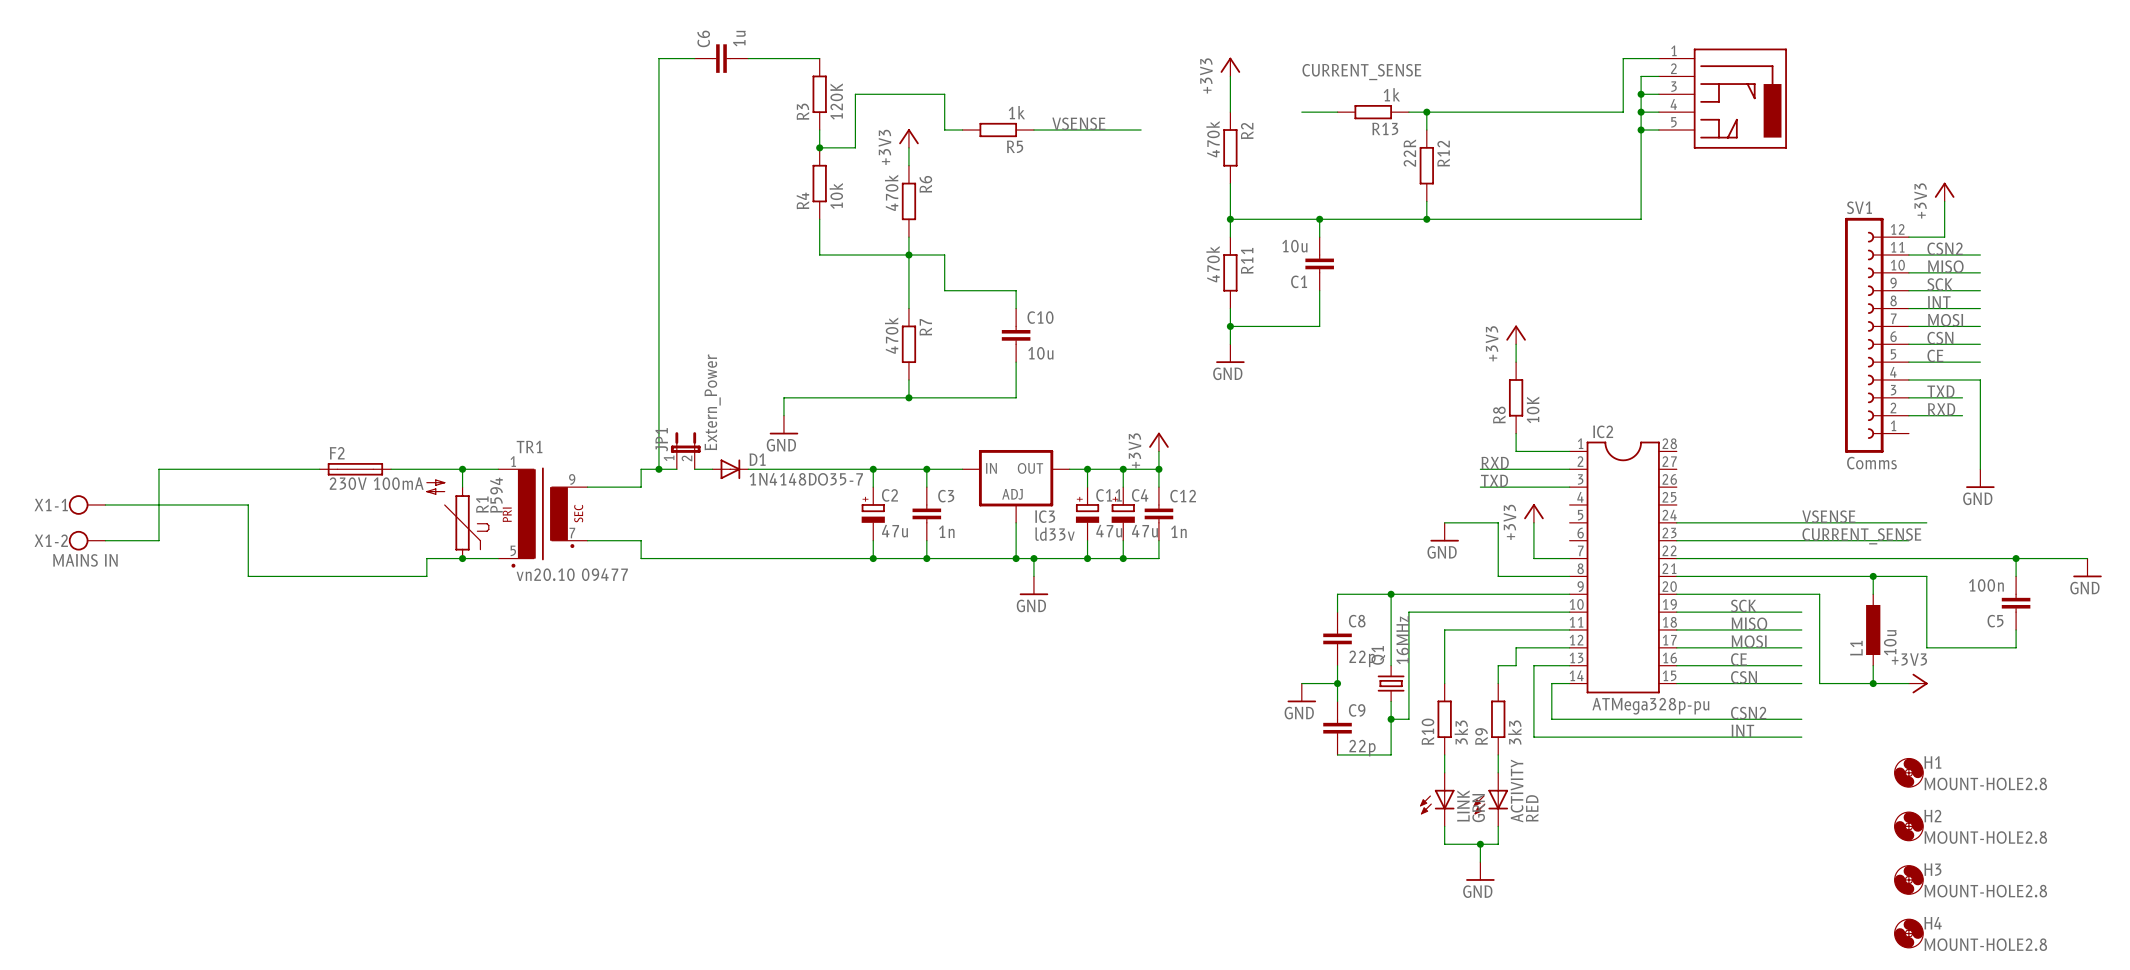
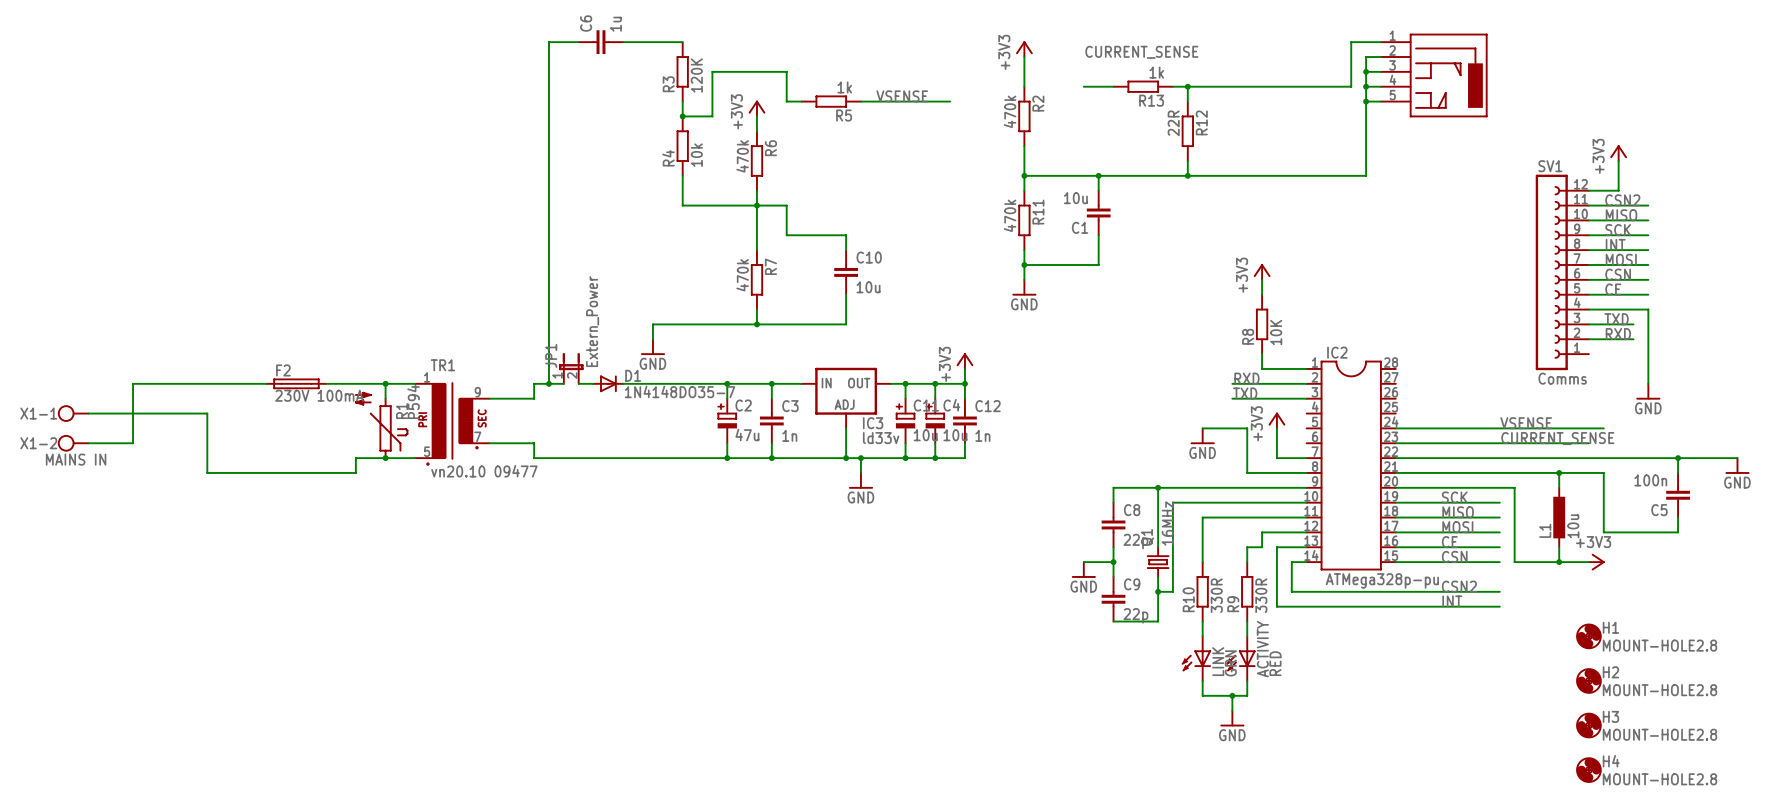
C11 value: 47u (1109, 531) -> 10u (925, 435)
C4 value: 47u (1144, 531) -> 10u (955, 435)
R10 value: 3k3 (1461, 732) -> 330R (1216, 595)
R9 value: 3k3 (1514, 732) -> 330R (1261, 595)

